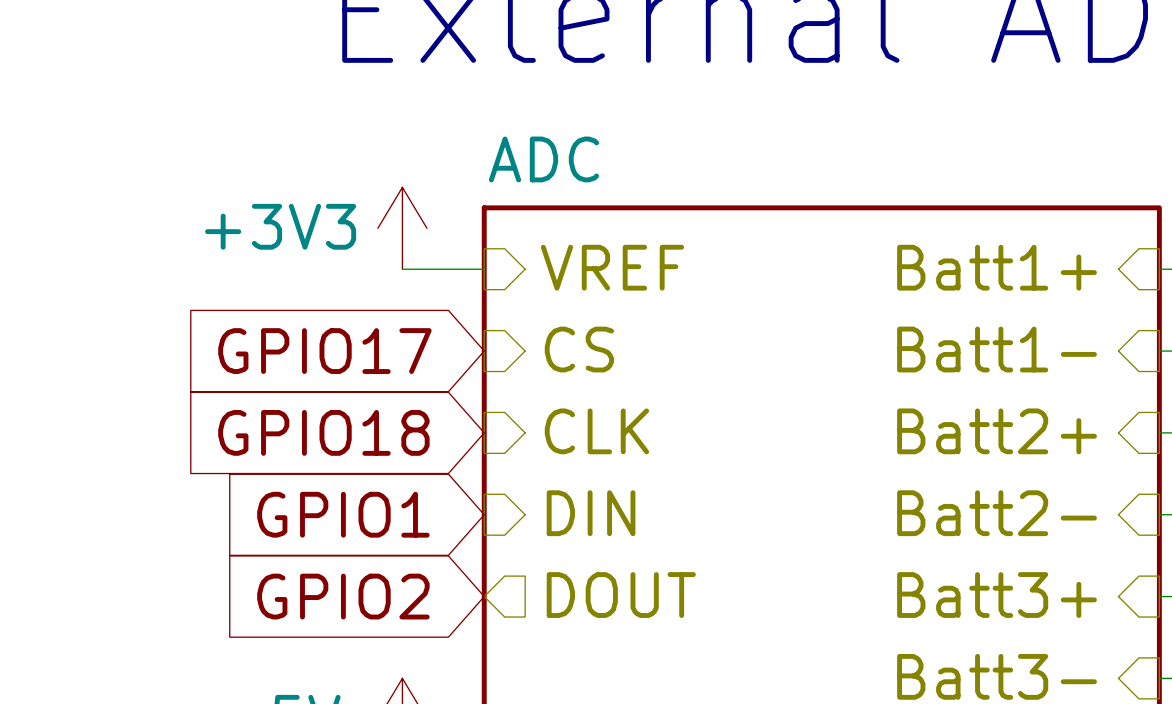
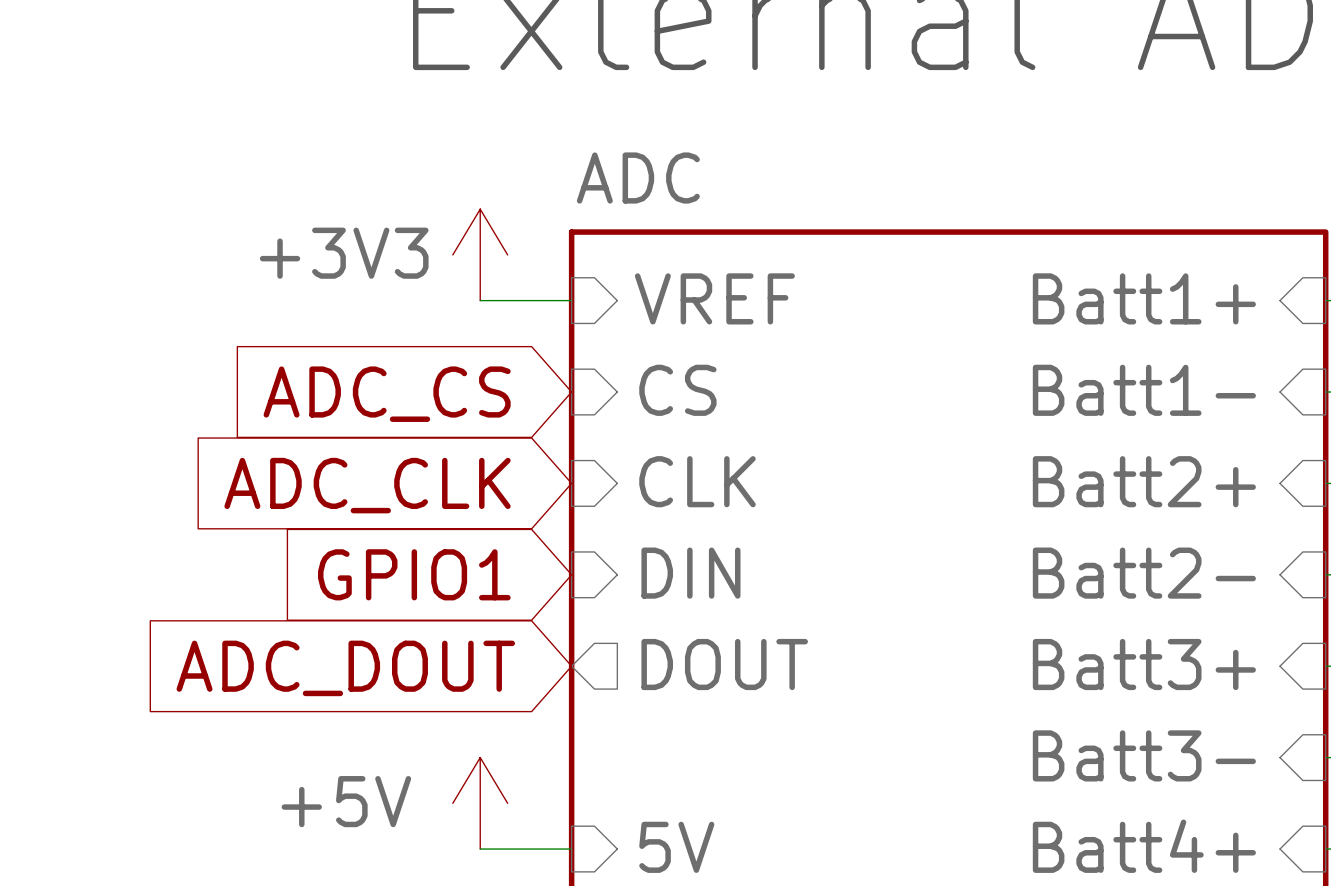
global label: GPIO17 (324, 351) -> ADC_CS (387, 394)
global label: GPIO18 (323, 432) -> ADC_CLK (367, 485)
global label: GPIO2 (343, 596) -> ADC_DOUT (345, 668)

